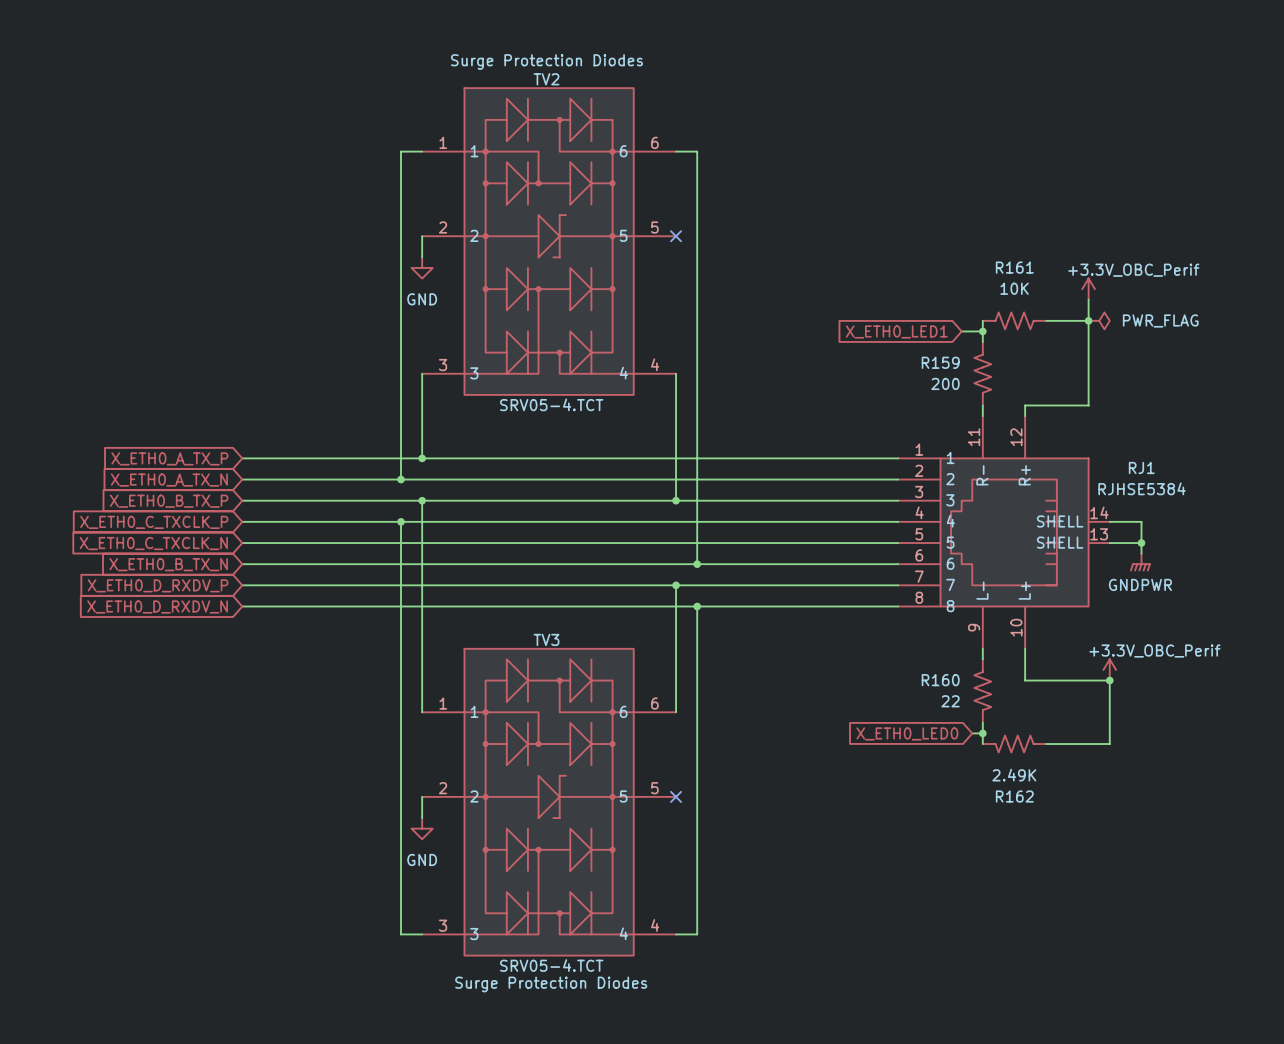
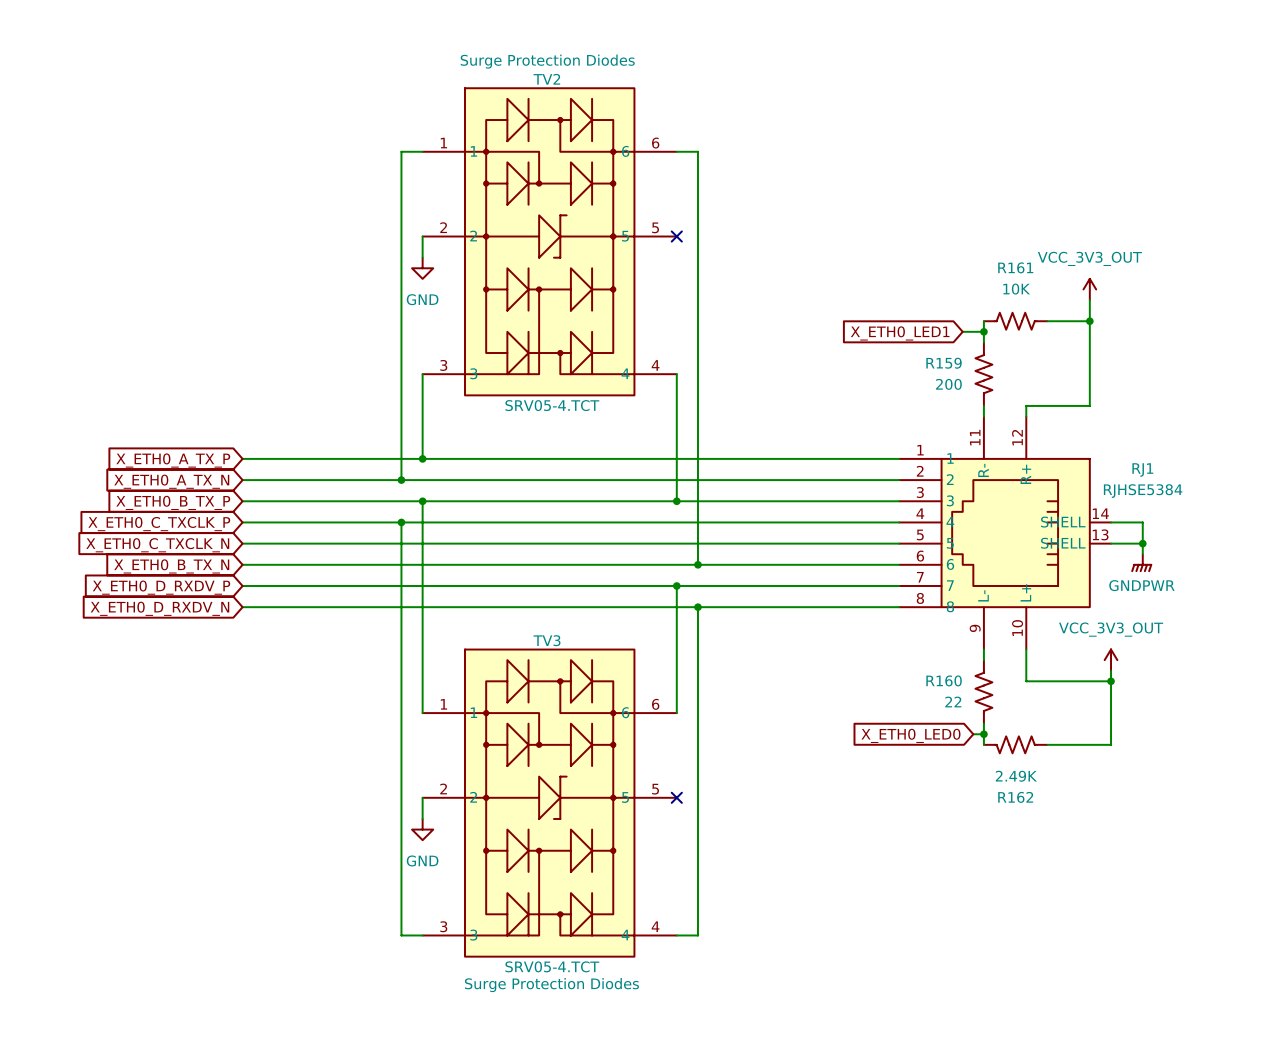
power symbol: +3.3V_OBC_Perif (1088, 289) -> VCC_3V3_OUT (1089, 289)
power symbol: PWR_FLAG (1099, 320) -> none
power symbol: none -> VCC_3V3_OUT (1111, 660)
power symbol: +3.3V_OBC_Perif (1109, 669) -> none

